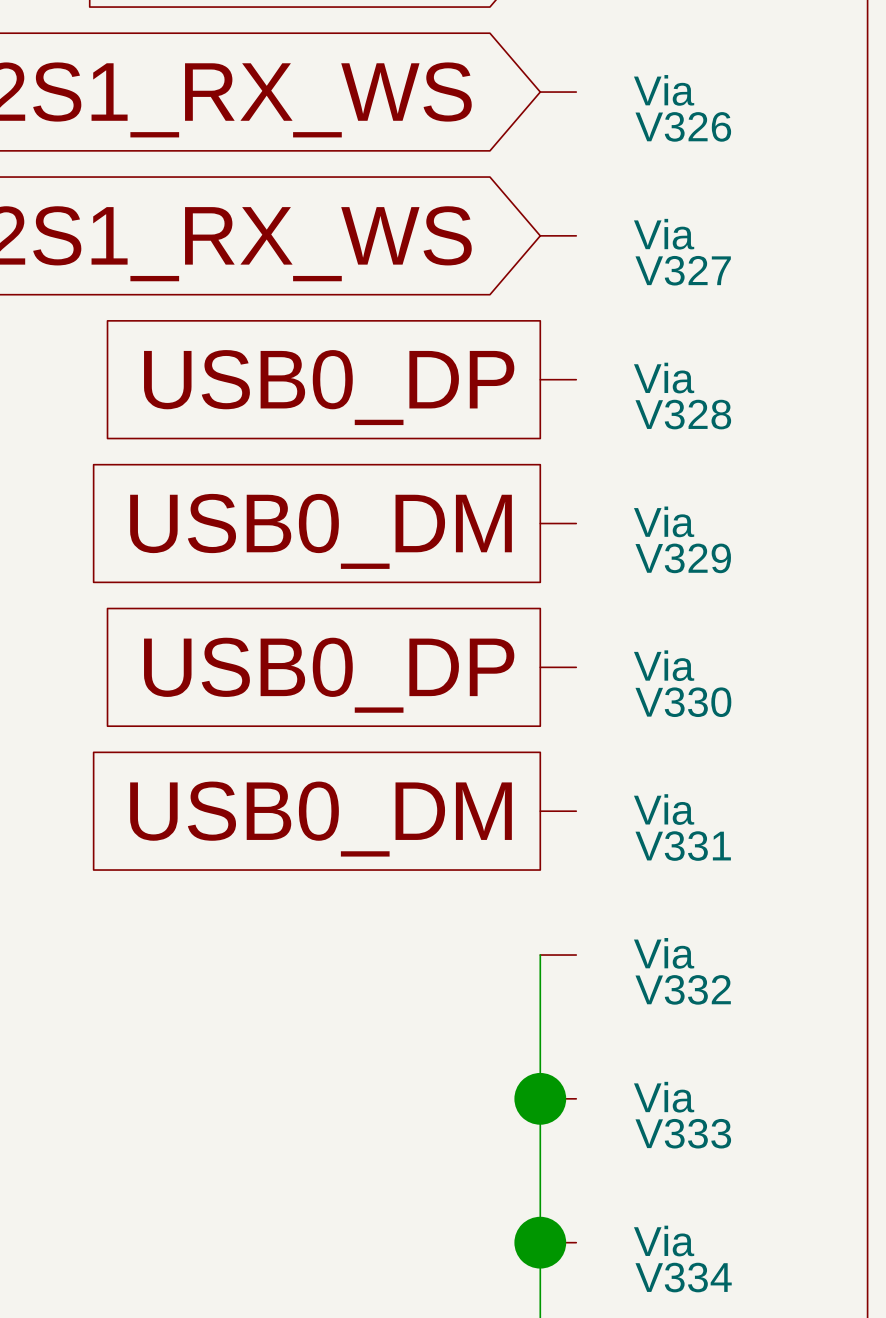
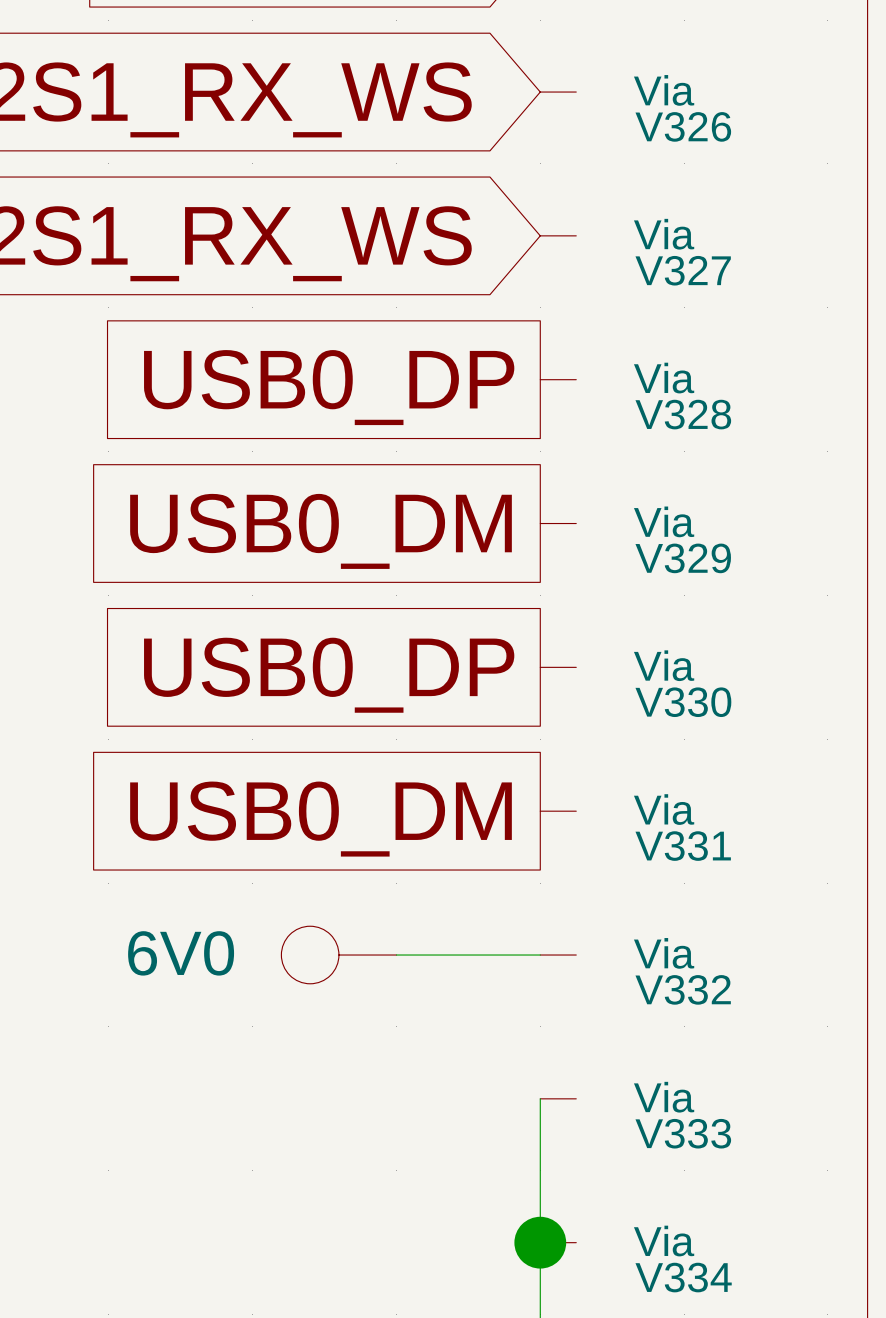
power symbol: none -> 6V0 (338, 955)
wire: (540, 955) (540, 1098) -> (540, 955) (396, 955)
junction: (540, 1098) -> none

